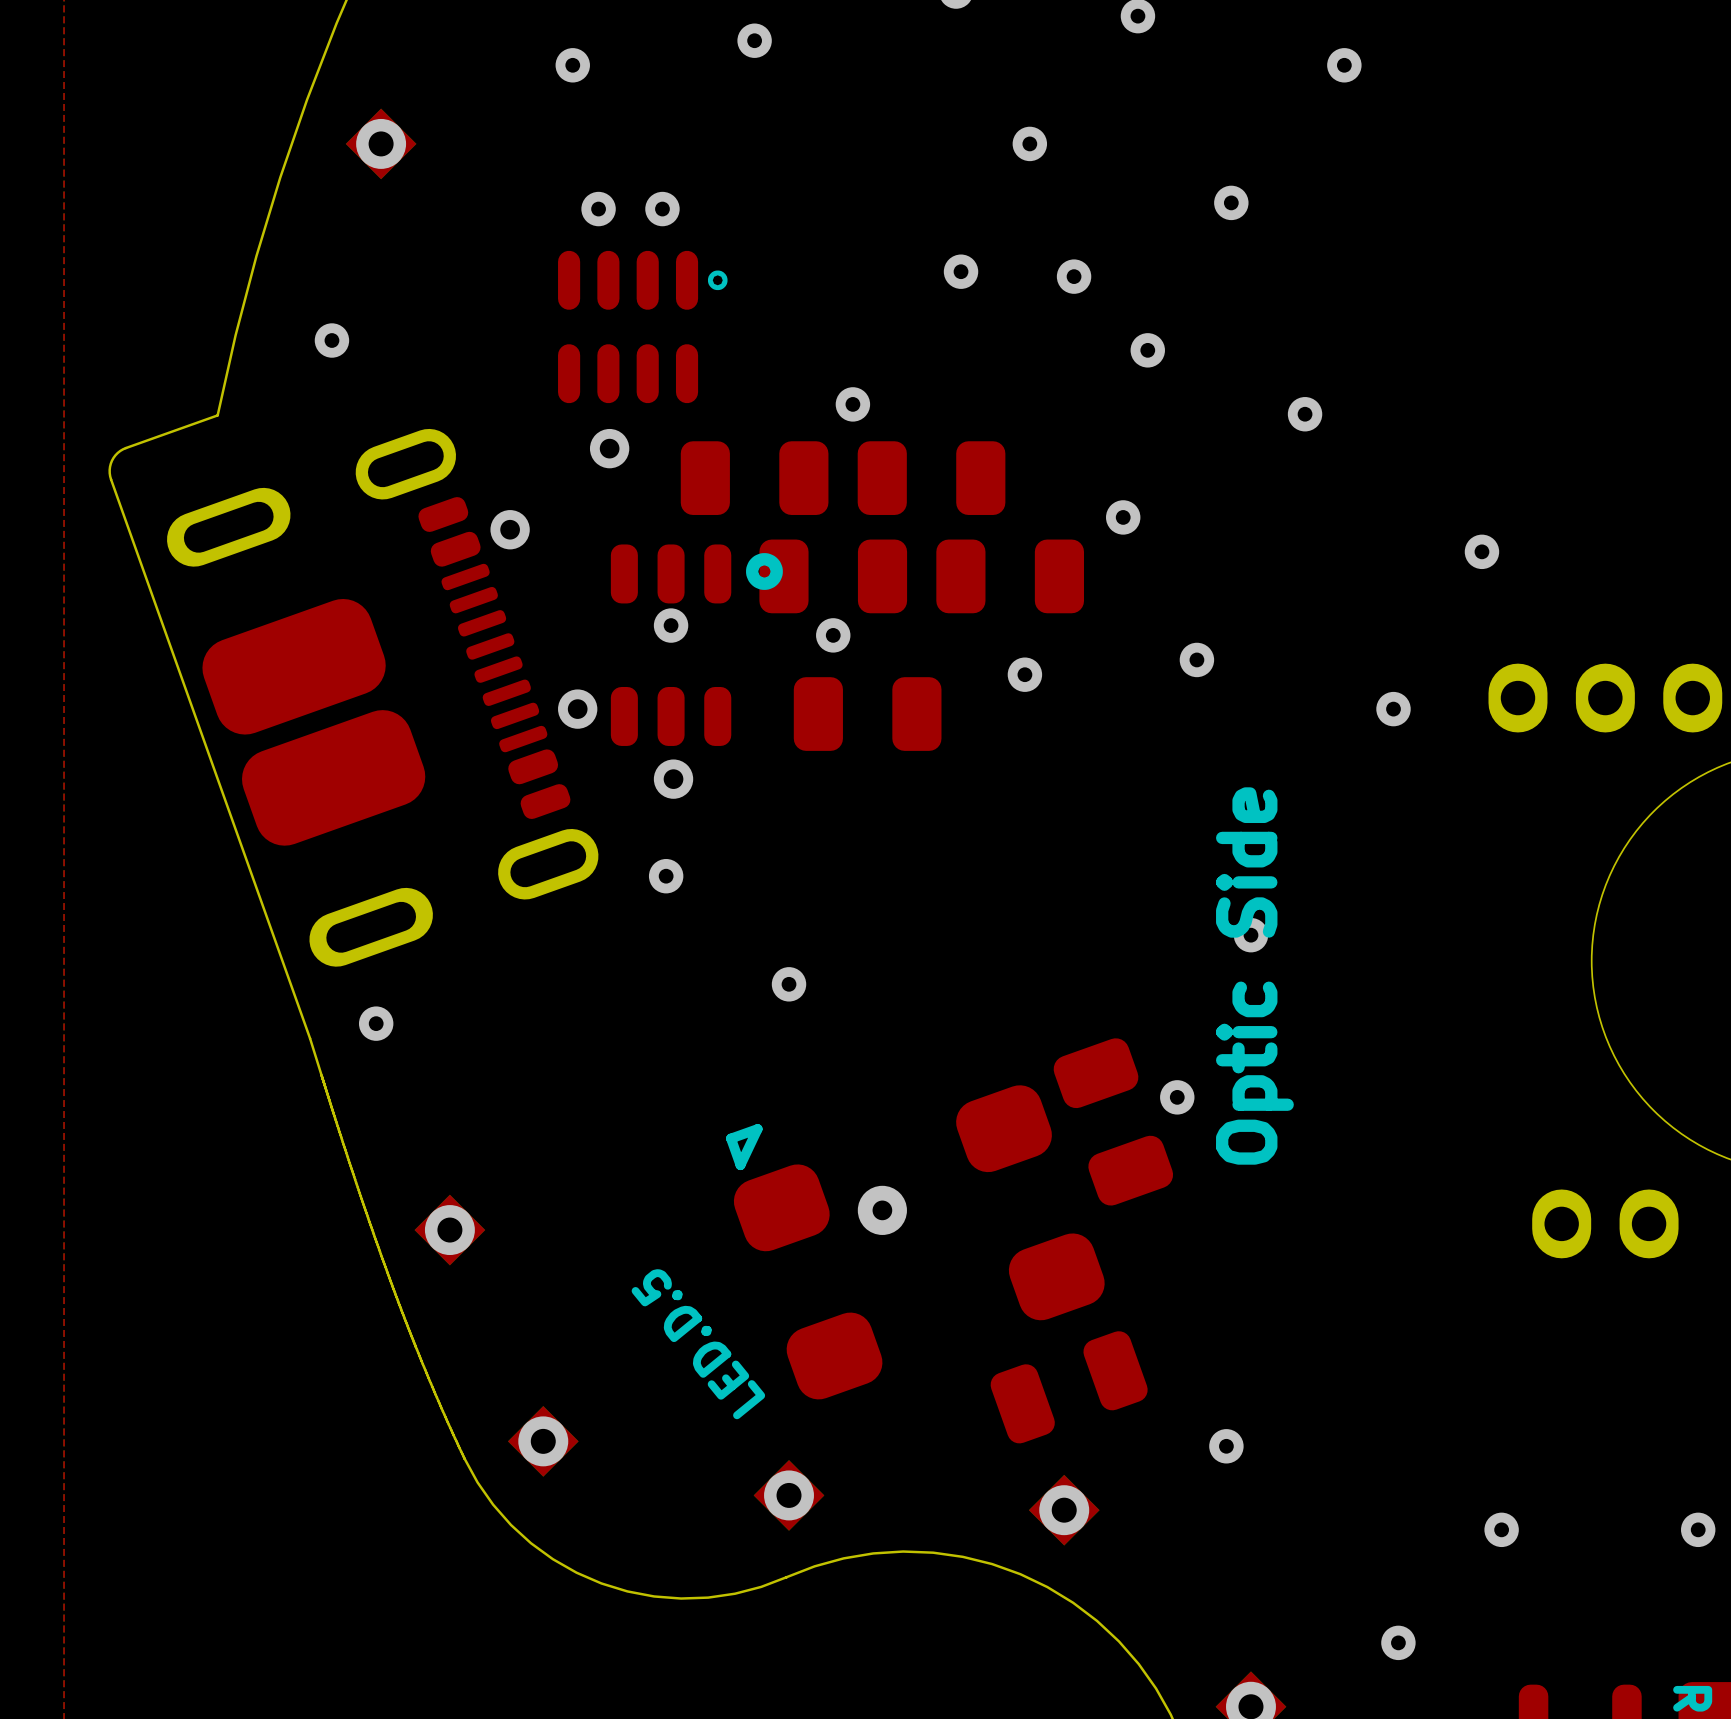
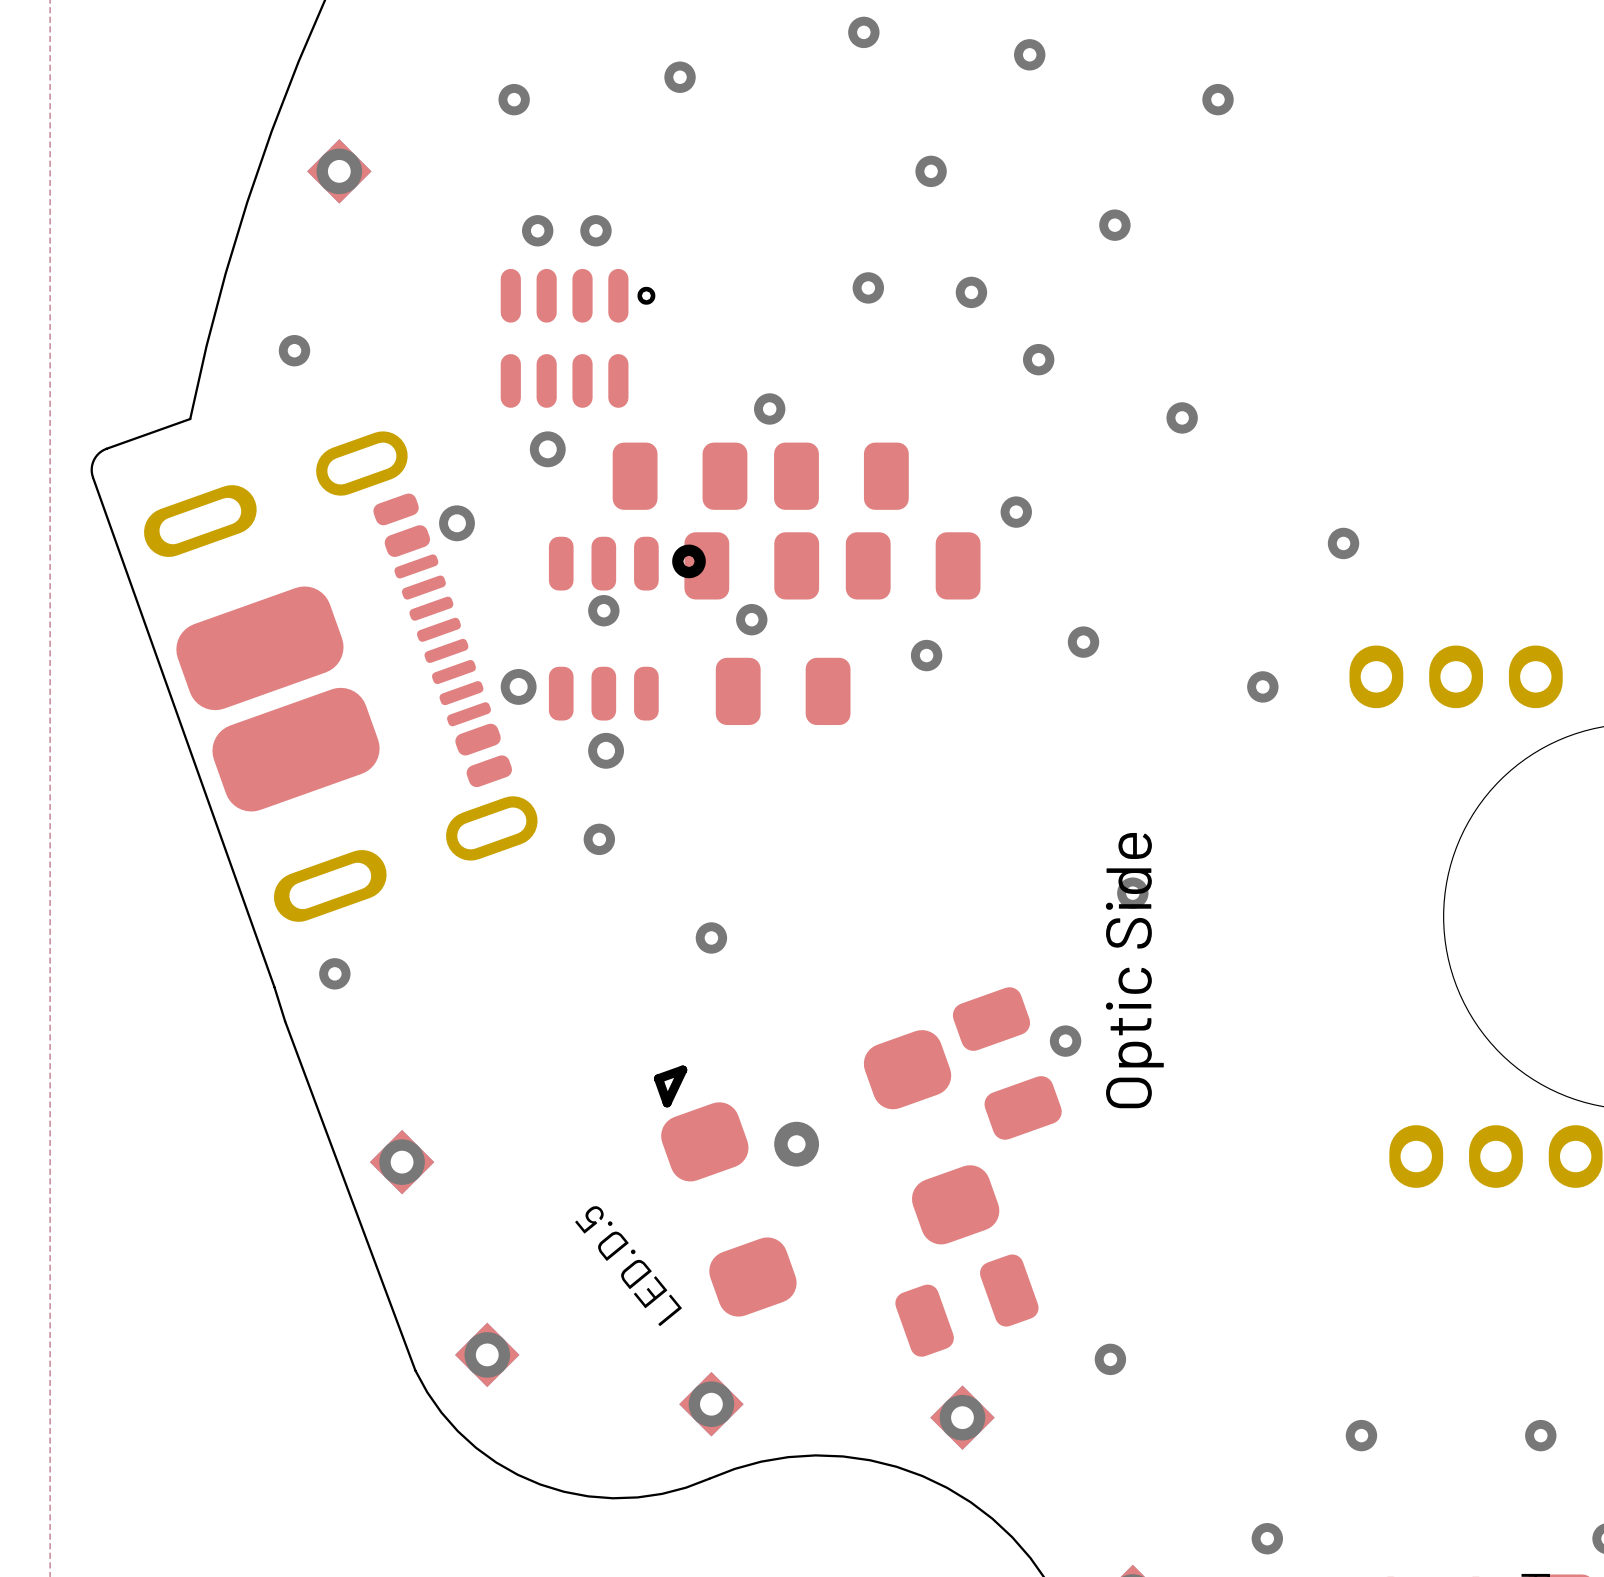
board edge: (325, 1088) (373, 1232) (415, 1346) -> none
board edge: (415, 1347) (464, 1458) -> (285, 1021) (415, 1370)

